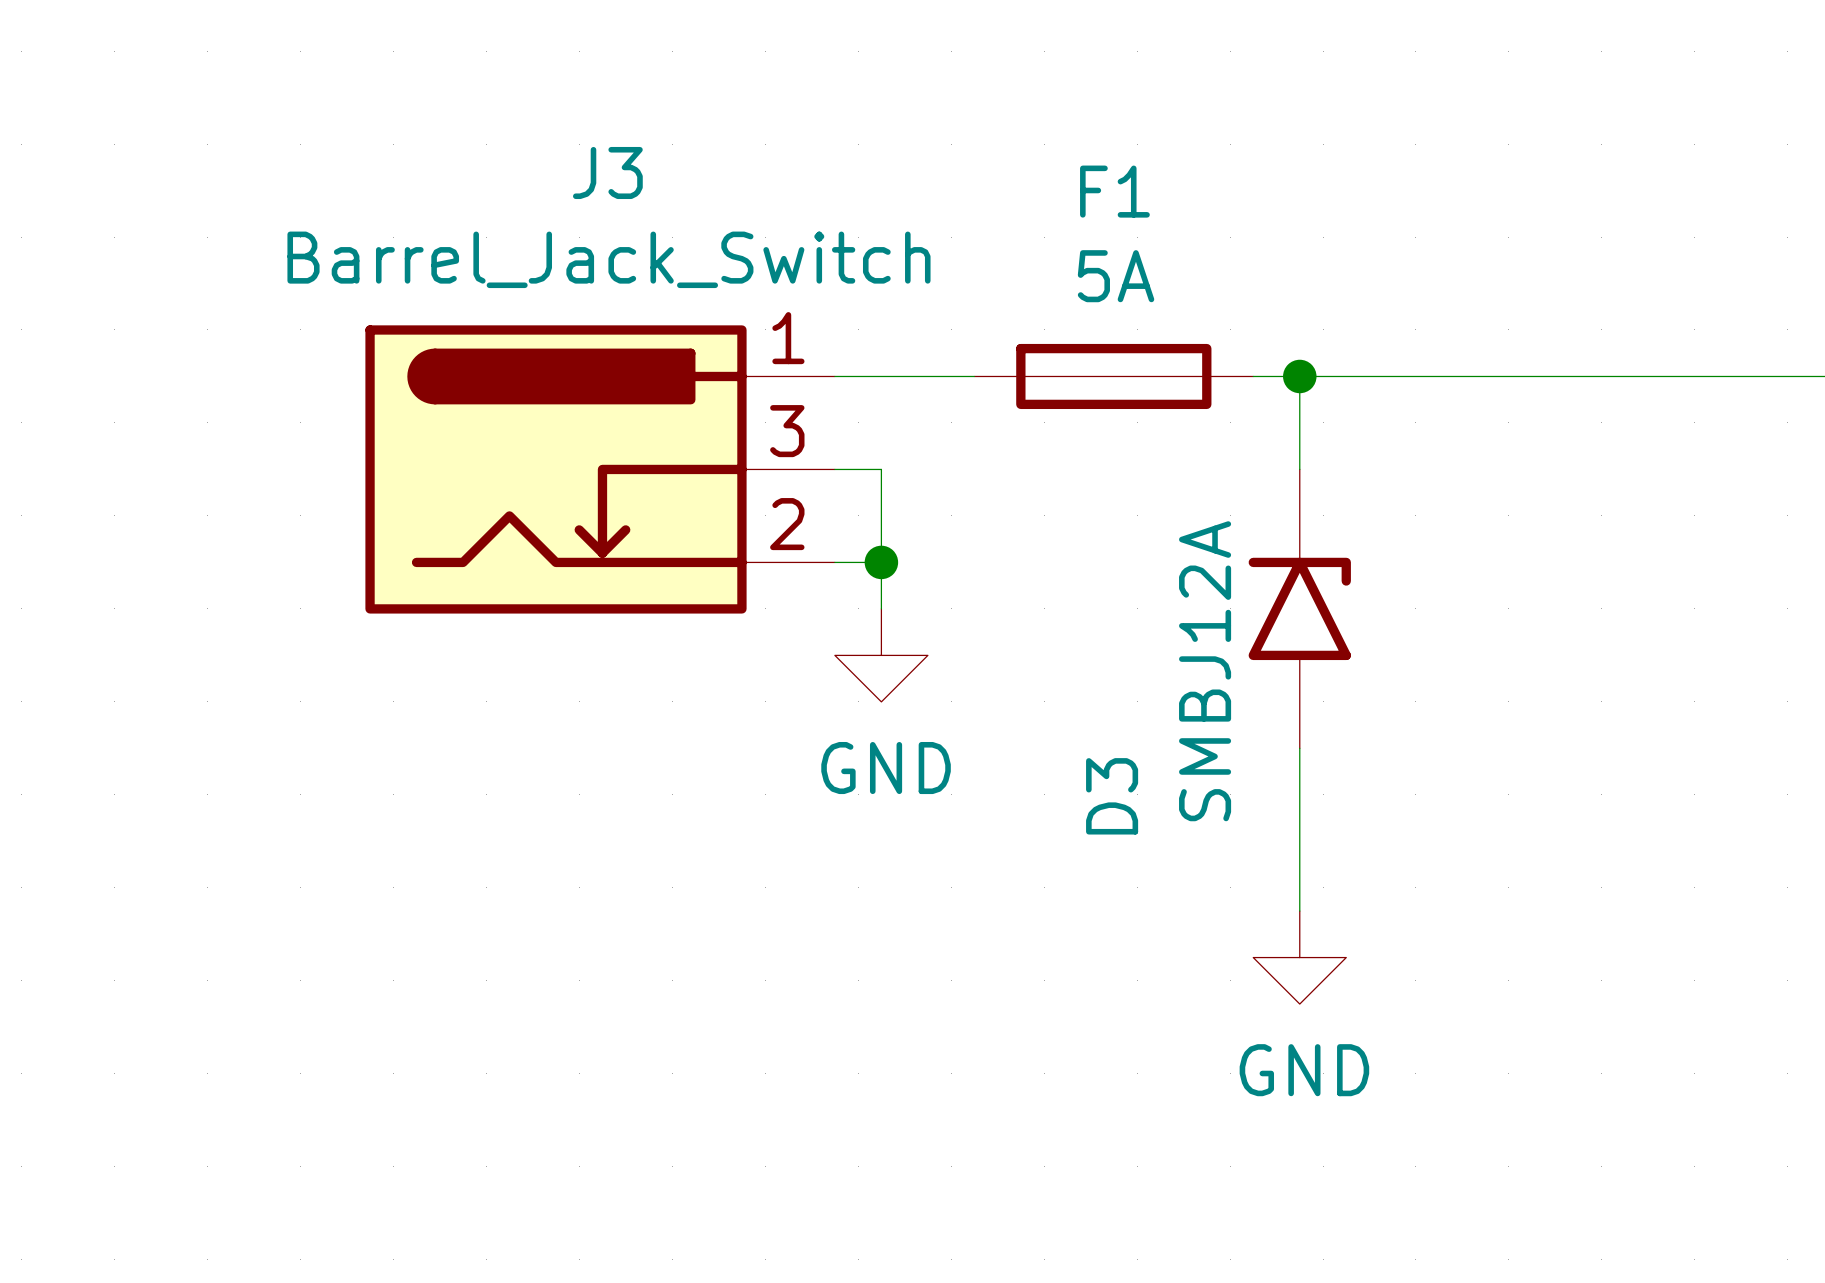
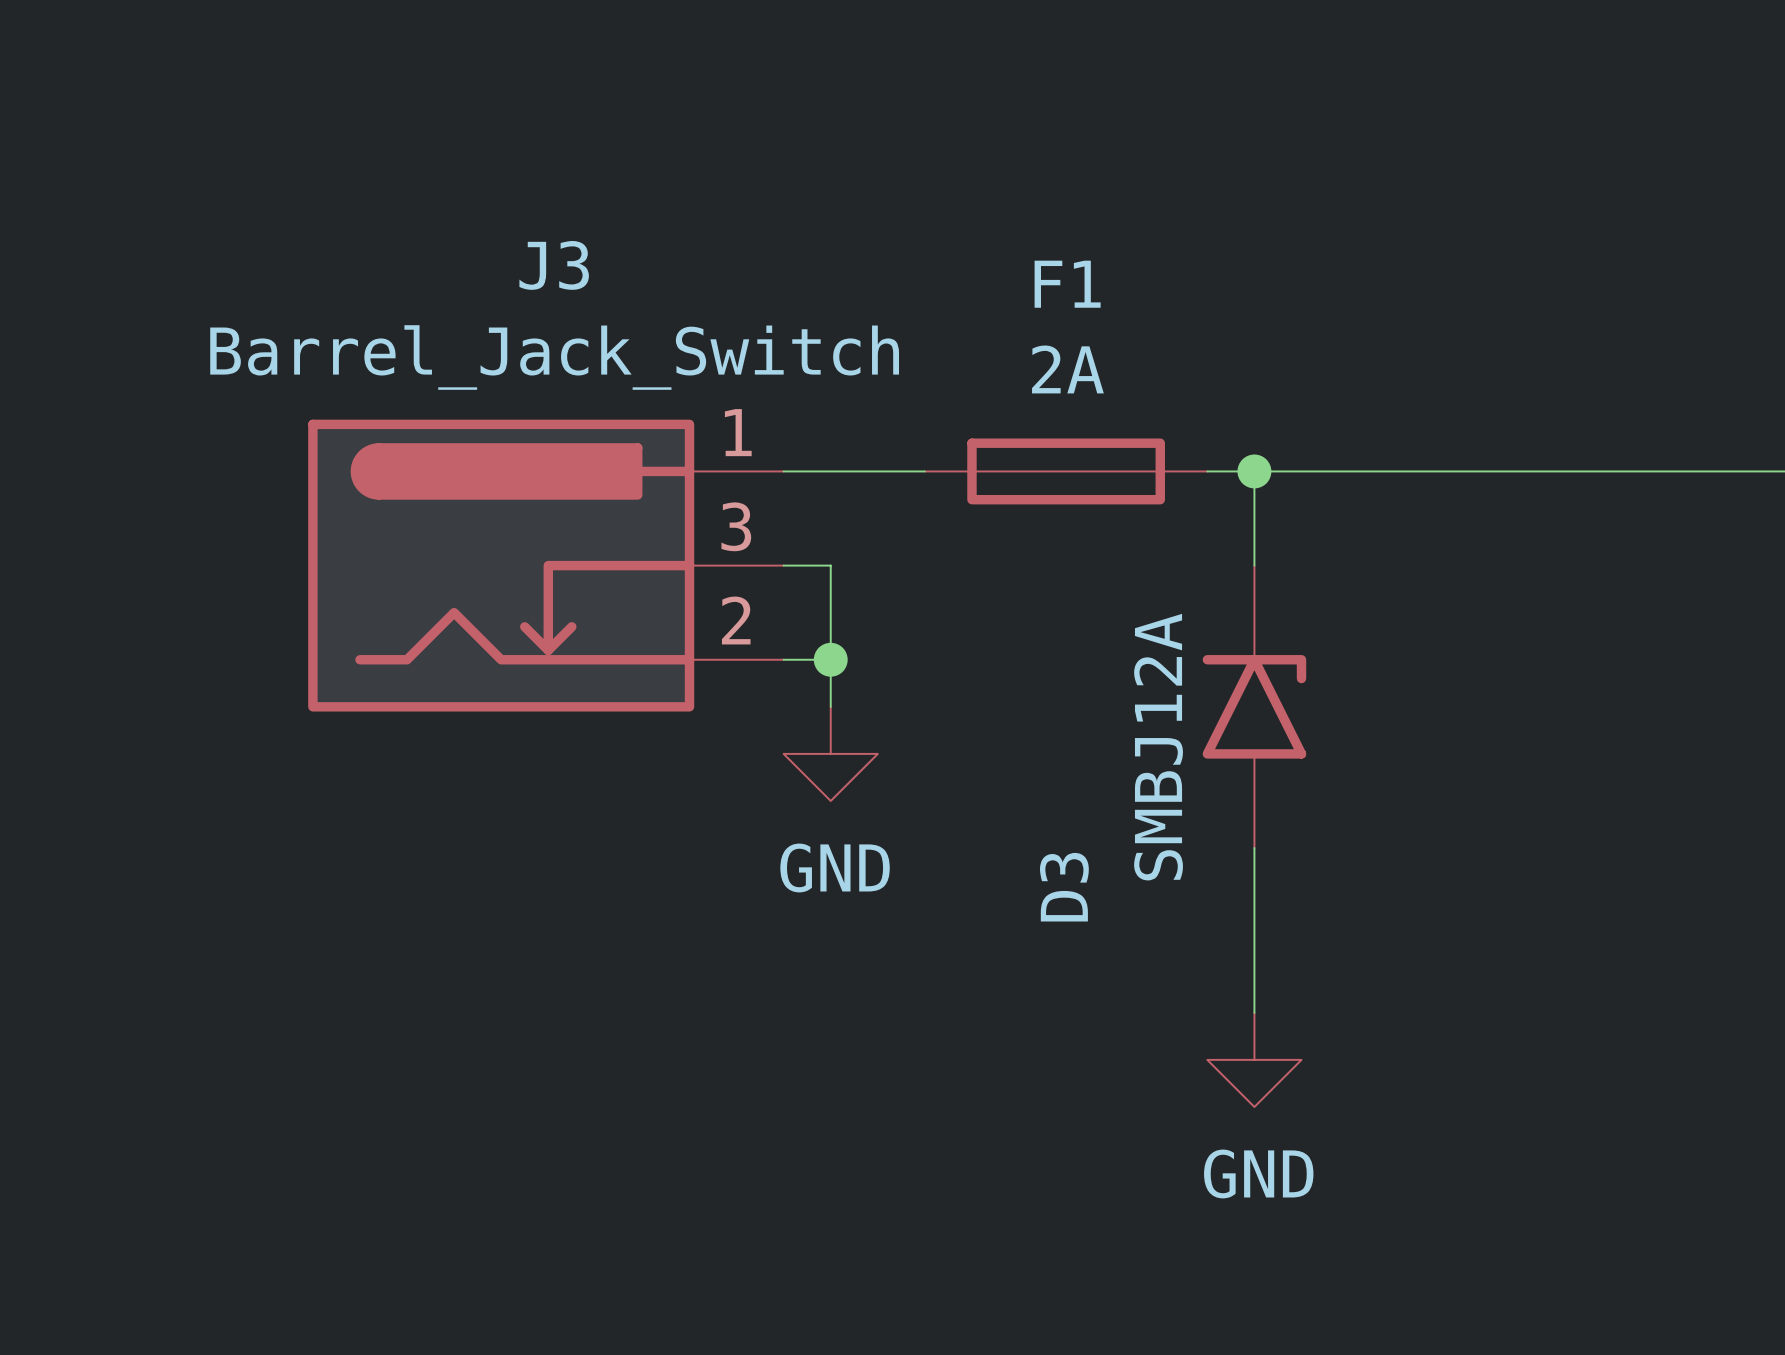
F1 value: 5A (1116, 276) -> 2A (1067, 369)

